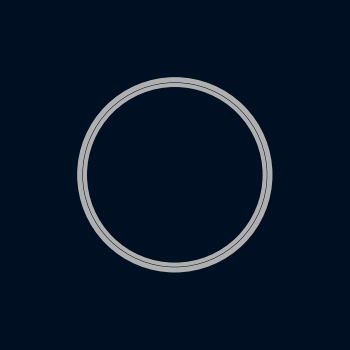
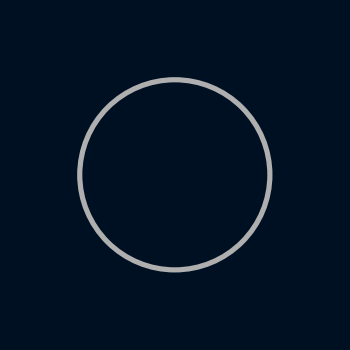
drawing: [82, 82, 267, 267] -> none

